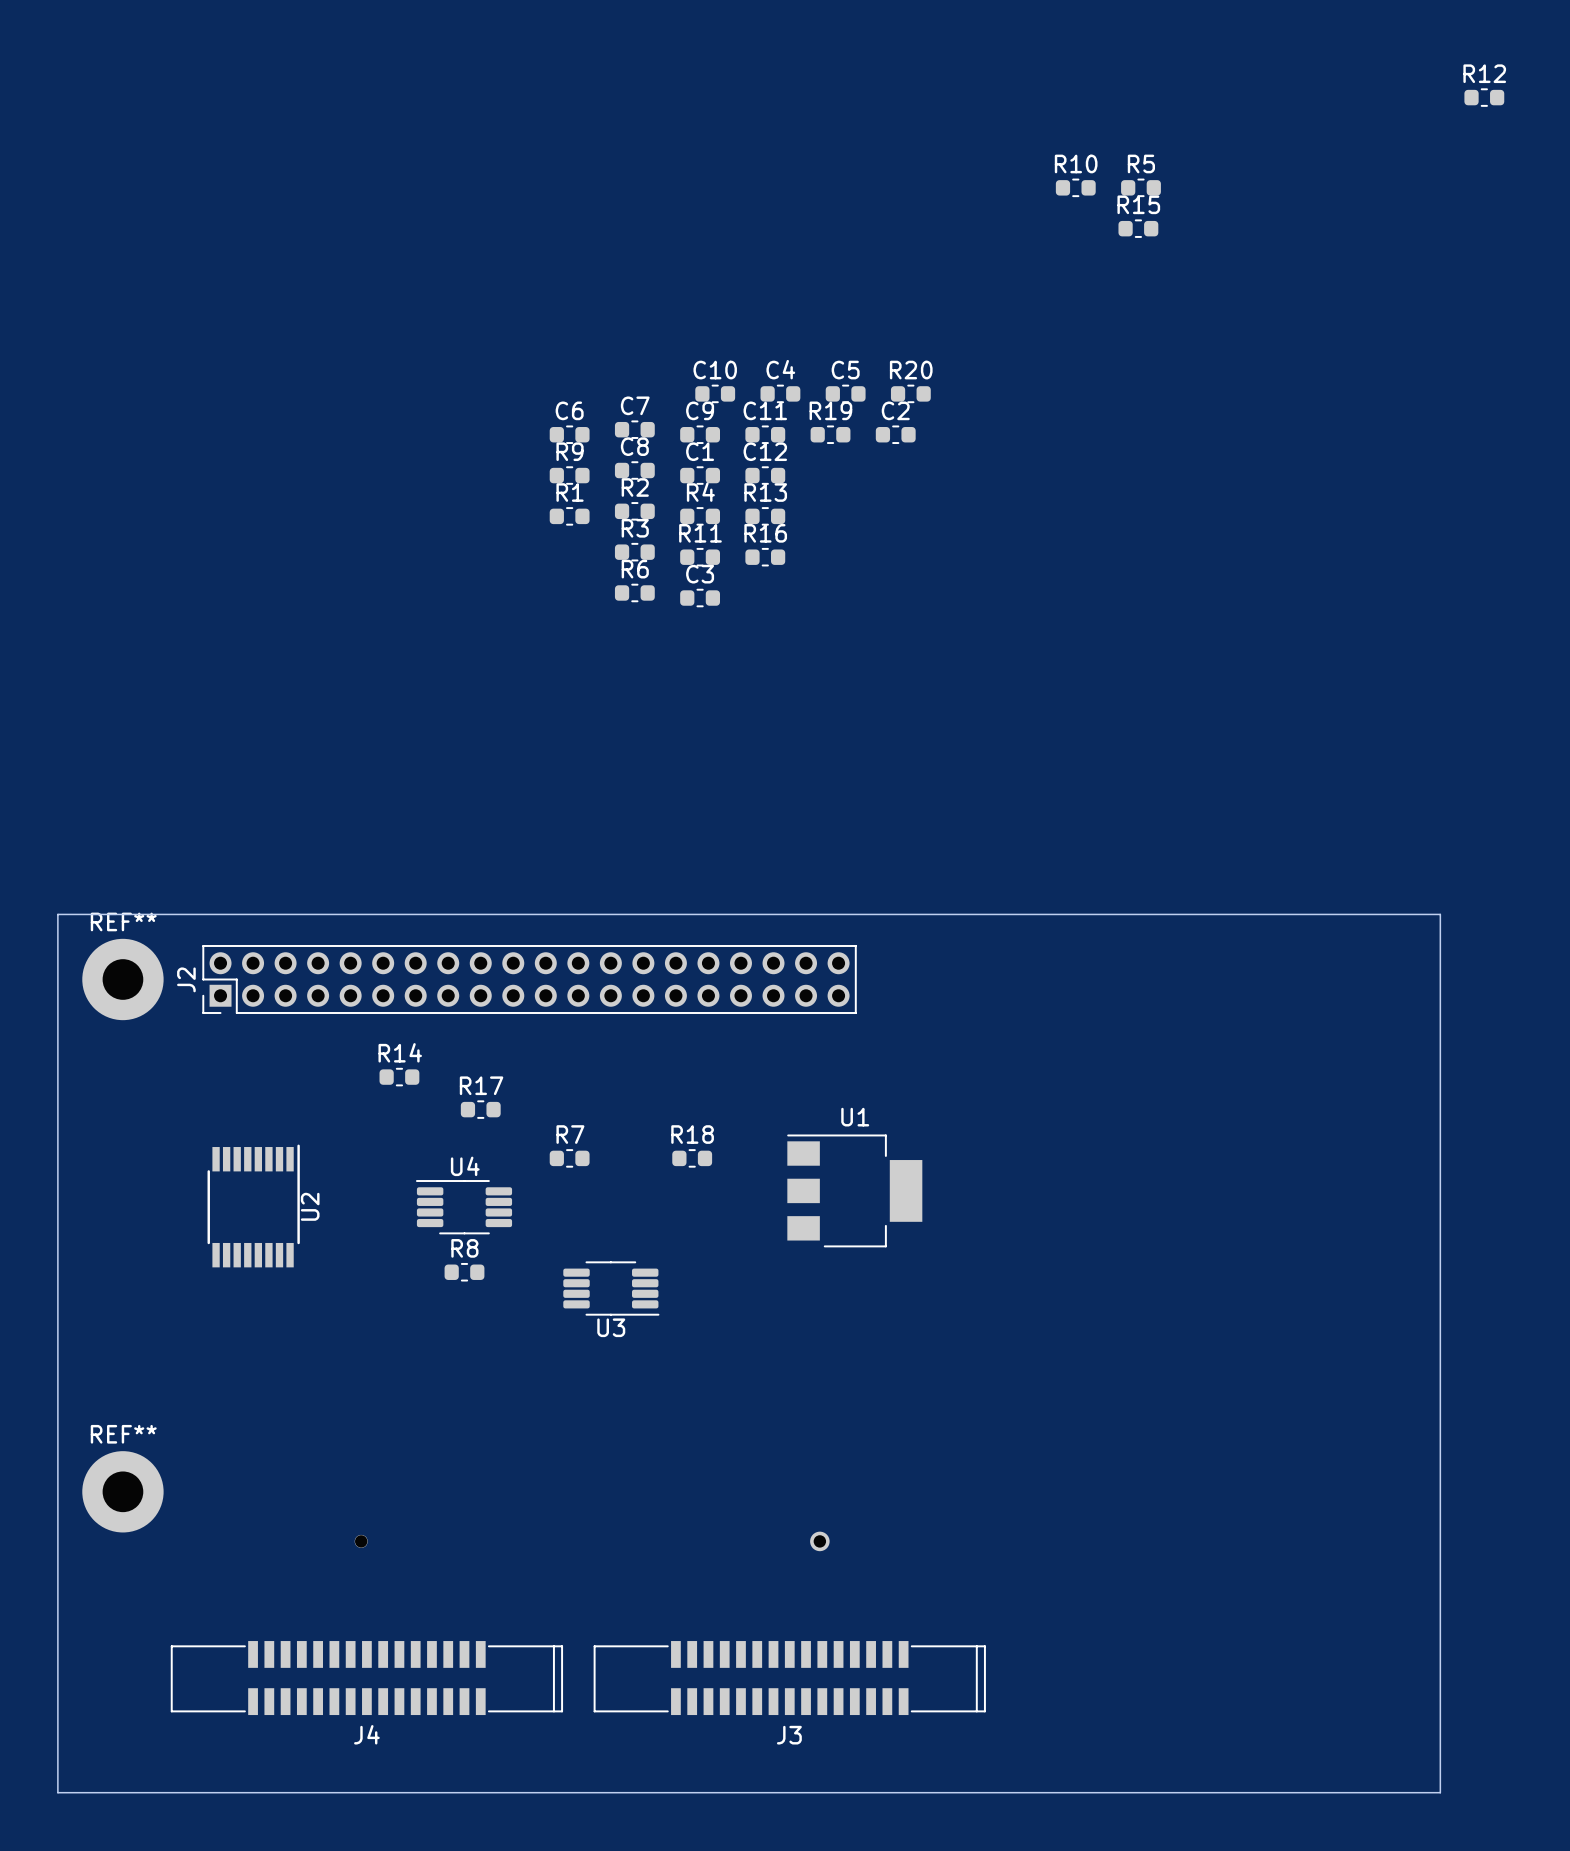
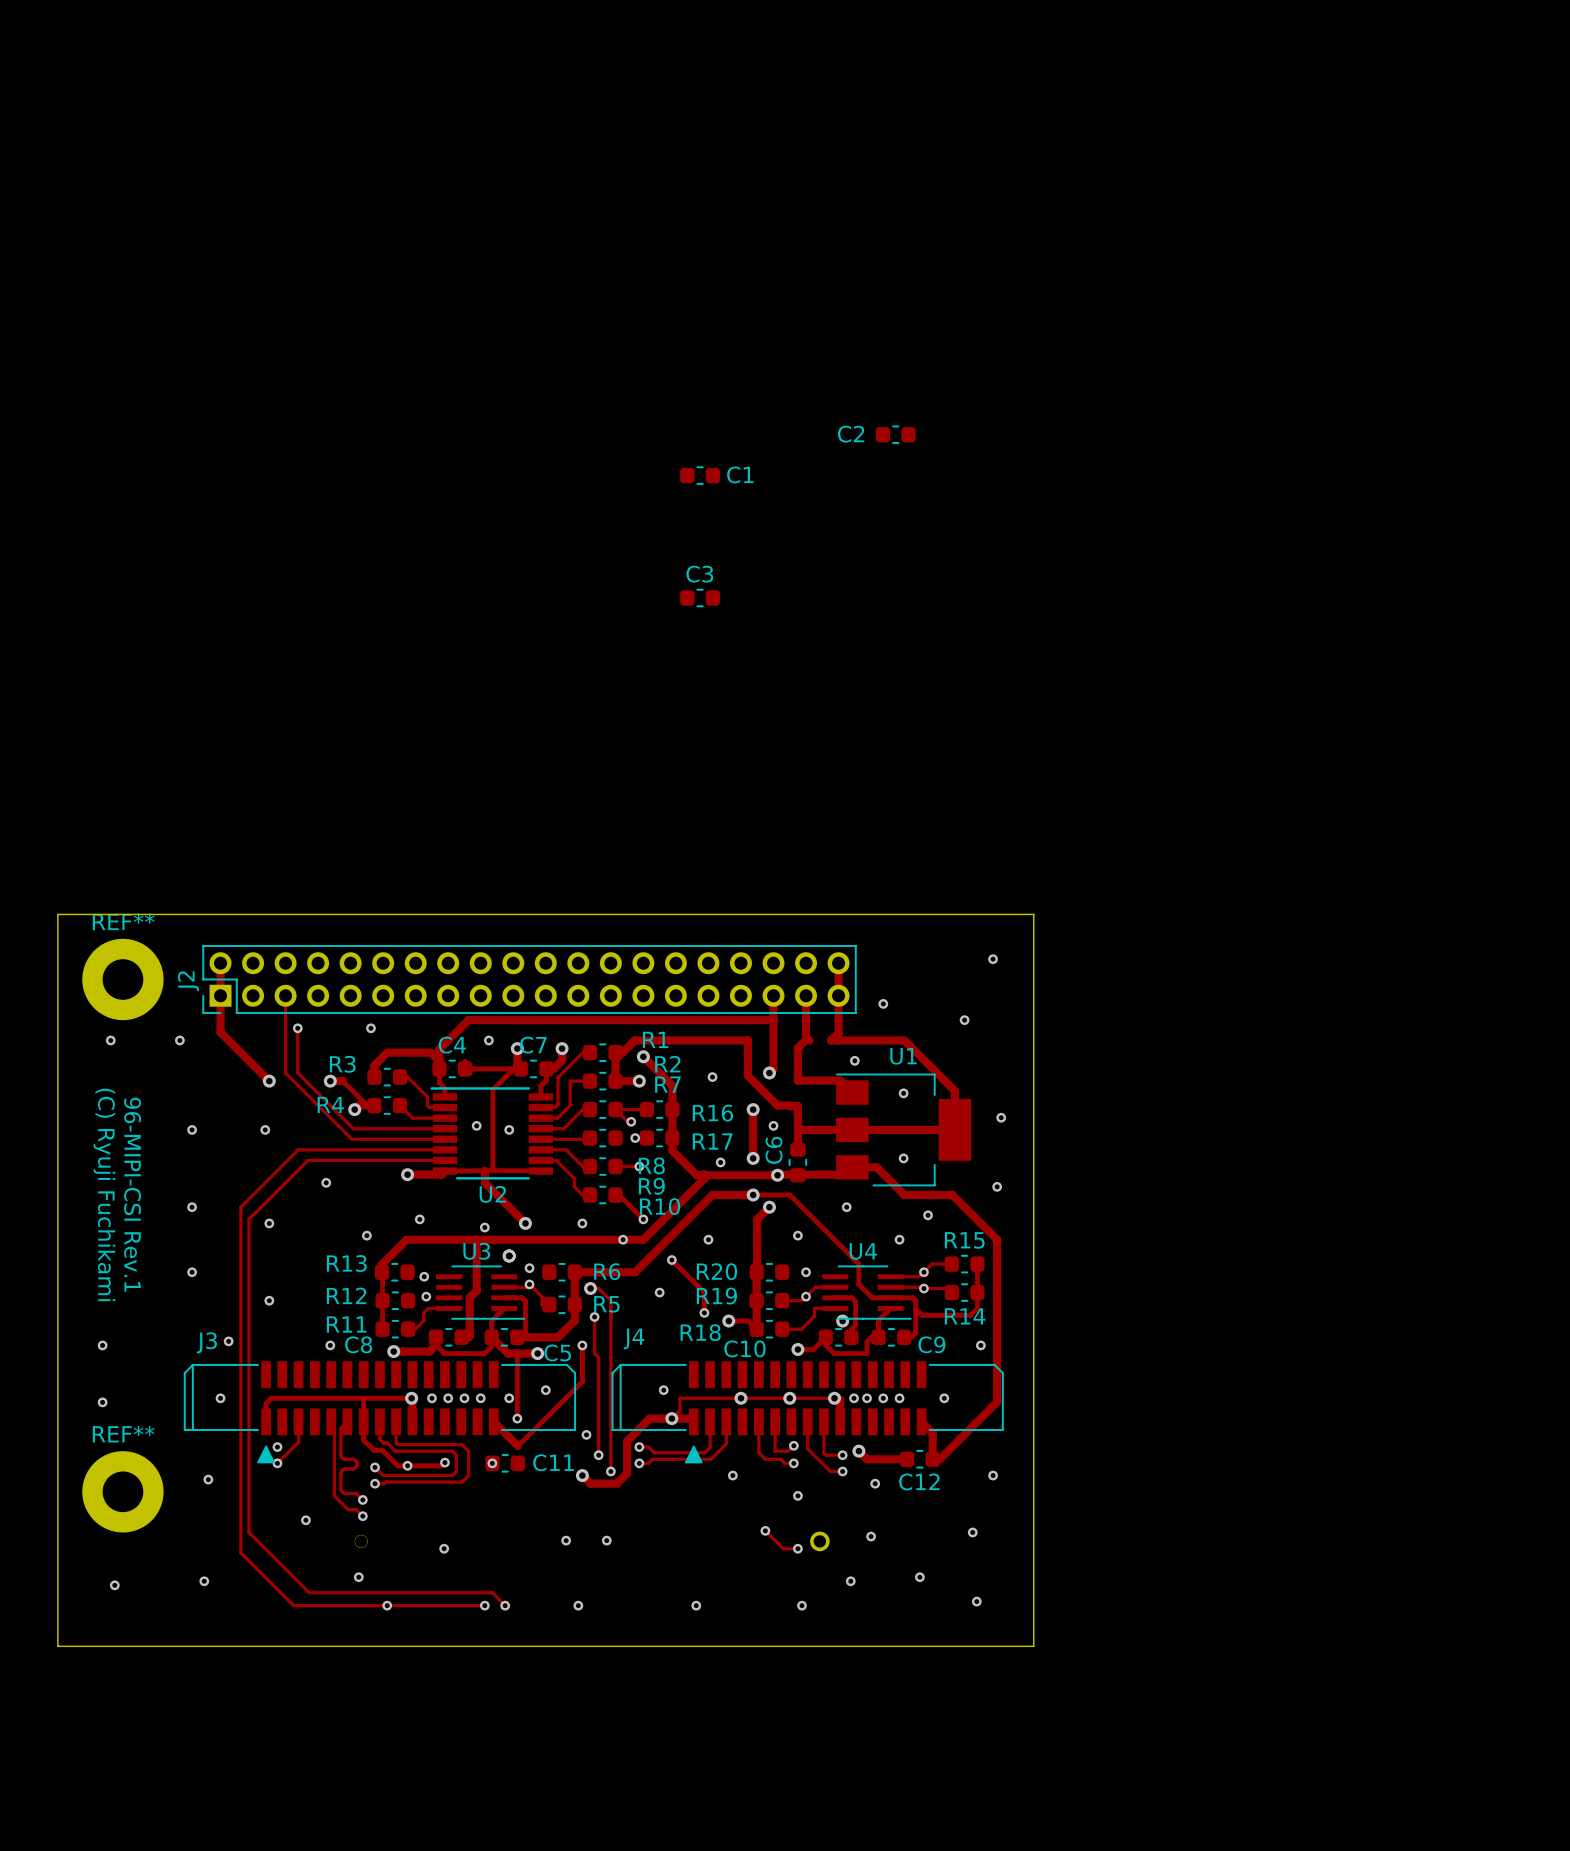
R12 name position: R12 (1484, 73) -> R12 (346, 1295)
R12 position: (1484, 97) -> (395, 1300)
R10 name position: R10 (1076, 163) -> R10 (660, 1206)
R5 name position: R5 (1141, 163) -> R5 (606, 1304)
R10 position: (1075, 187) -> (602, 1194)
R5 position: (1141, 187) -> (562, 1304)
R15 position: (1138, 228) -> (964, 1264)
C10 name position: C10 (715, 370) -> C10 (744, 1348)
C5 name position: C5 (845, 370) -> C5 (557, 1352)
R20 name position: R20 (911, 370) -> R20 (716, 1271)
C10 position: (715, 393) -> (838, 1337)
C4 position: (780, 393) -> (452, 1068)
C5 position: (845, 393) -> (504, 1337)
R20 position: (910, 393) -> (769, 1272)
C9 name position: C9 (700, 410) -> C9 (931, 1344)
C11 name position: C11 (765, 410) -> C11 (553, 1462)
R19 name position: R19 (830, 410) -> R19 (716, 1296)
C2 name position: C2 (895, 410) -> C2 (851, 434)
C7 position: (634, 429) -> (533, 1068)
C6 rotation: 0° (569, 434) -> 90° clockwise (797, 1162)
C6 position: (569, 434) -> (797, 1162)
C9 position: (700, 434) -> (891, 1337)
C11 position: (765, 434) -> (505, 1463)
R19 position: (830, 434) -> (769, 1300)
C8 name position: C8 (634, 446) -> C8 (358, 1344)
R9 name position: R9 (570, 451) -> R9 (651, 1186)
C1 name position: C1 (700, 451) -> C1 (740, 474)
C12 name position: C12 (765, 451) -> C12 (919, 1481)
C8 position: (634, 470) -> (448, 1337)
R9 position: (569, 475) -> (602, 1166)
C12 position: (765, 475) -> (919, 1459)
R2 name position: R2 (635, 487) -> R2 (667, 1064)
R1 name position: R1 (570, 492) -> R1 (655, 1039)
R4 name position: R4 (700, 492) -> R4 (330, 1104)
R13 name position: R13 (765, 492) -> R13 (346, 1263)
R2 position: (634, 511) -> (602, 1081)
R1 position: (569, 516) -> (602, 1052)
R4 position: (700, 516) -> (387, 1105)
R13 position: (765, 516) -> (394, 1272)
R3 name position: R3 (635, 528) -> R3 (342, 1064)
R11 name position: R11 (700, 533) -> R11 (346, 1324)
R16 name position: R16 (765, 533) -> R16 (712, 1113)
R3 position: (634, 552) -> (387, 1077)
R11 position: (700, 557) -> (395, 1329)
R16 position: (765, 557) -> (659, 1109)
R6 name position: R6 (635, 569) -> R6 (607, 1271)
R6 position: (634, 592) -> (562, 1272)
board edge: (1033, 914) (1440, 914) (1440, 1792) (57, 1792) (57, 1646) -> (1033, 914) (1033, 1646) (57, 1646)
via: none -> (993, 959)
track: none -> (220, 963) (220, 1032) (269, 1081)
track: none -> (838, 963) (838, 1032) (831, 1040) (904, 1040) (954, 1090) (954, 1129) (801, 1129) (797, 1125)
track: none -> (285, 995) (285, 1073) (351, 1139) (444, 1139)
track: none -> (773, 995) (773, 1068) (769, 1073)
track: none -> (806, 995) (806, 1037) (809, 1040)
via: none -> (883, 1003)
track: none -> (773, 1020) (468, 1020) (439, 1049) (439, 1082) (444, 1088) (444, 1097)
via: none -> (964, 1020)
track: none -> (297, 1028) (297, 1073) (353, 1128) (444, 1128)
via: none -> (297, 1028)
via: none -> (370, 1028)
via: none -> (110, 1040)
via: none -> (179, 1040)
via: none -> (488, 1040)
track: none -> (805, 1040) (797, 1048) (797, 1080) (840, 1080) (852, 1092)
track: none -> (517, 1048) (517, 1065) (520, 1068) (465, 1068) (465, 1061)
via: none -> (517, 1048)
track: none -> (562, 1048) (562, 1060) (553, 1068) (546, 1068) (546, 1080) (540, 1086) (540, 1097)
via: none -> (562, 1048)
R14 name position: R14 (400, 1052) -> R14 (965, 1316)
track: none -> (589, 1052) (582, 1052) (558, 1077) (558, 1104) (554, 1107) (540, 1107)
track: none -> (643, 1056) (672, 1085) (672, 1150) (696, 1175) (704, 1174)
via: none -> (643, 1056)
via: none -> (854, 1060)
track: none -> (439, 1061) (430, 1052) (387, 1052) (374, 1065) (374, 1077)
track: none -> (513, 1068) (492, 1089) (492, 1170)
via: none -> (769, 1073)
R14 position: (399, 1077) -> (964, 1292)
track: none -> (400, 1077) (407, 1077) (427, 1097) (427, 1105) (429, 1107) (444, 1107)
via: none -> (712, 1077)
via: none -> (269, 1081)
track: none -> (330, 1081) (342, 1080) (367, 1105) (374, 1105) (358, 1105) (354, 1109)
via: none -> (330, 1081)
track: none -> (589, 1081) (570, 1081) (570, 1105) (557, 1118) (540, 1118)
track: none -> (639, 1081) (615, 1081) (615, 1052) (622, 1052) (634, 1040) (747, 1040) (747, 1075) (777, 1105) (797, 1106) (797, 1149)
via: none -> (639, 1081)
R17 name position: R17 (481, 1085) -> R17 (712, 1141)
via: none -> (903, 1093)
track: none -> (400, 1105) (412, 1118) (444, 1118)
via: none -> (354, 1109)
R17 position: (480, 1109) -> (659, 1138)
track: none -> (589, 1109) (582, 1109) (563, 1128) (540, 1128)
track: none -> (646, 1109) (615, 1109) (627, 1121) (631, 1121)
track: none -> (753, 1109) (753, 1158)
via: none -> (753, 1109)
via: none -> (1001, 1117)
via: none -> (631, 1121)
via: none -> (476, 1125)
via: none -> (773, 1125)
via: none -> (192, 1129)
via: none -> (265, 1129)
via: none -> (509, 1129)
R7 name position: R7 (570, 1134) -> R7 (667, 1084)
R18 name position: R18 (692, 1134) -> R18 (700, 1332)
track: none -> (589, 1138) (540, 1139)
via: none -> (635, 1138)
track: none -> (444, 1149) (298, 1149) (240, 1207) (240, 1552) (293, 1605) (484, 1605)
track: none -> (540, 1149) (566, 1149) (582, 1166) (589, 1166)
R7 position: (569, 1158) -> (602, 1109)
R18 position: (692, 1158) -> (769, 1329)
via: none -> (753, 1158)
via: none -> (903, 1158)
track: none -> (444, 1160) (307, 1160) (248, 1219) (248, 1532) (309, 1592) (492, 1592) (505, 1605)
track: none -> (540, 1160) (556, 1160) (574, 1178) (574, 1186) (582, 1194) (589, 1194)
via: none -> (720, 1162)
track: none -> (615, 1166) (639, 1166)
via: none -> (639, 1166)
track: none -> (484, 1170) (484, 1182) (525, 1223)
track: none -> (492, 1170) (540, 1171)
track: none -> (492, 1170) (444, 1171)
track: none -> (444, 1171) (441, 1174) (407, 1174)
via: none -> (407, 1174)
track: none -> (704, 1174) (704, 1178) (643, 1239) (406, 1239) (381, 1264) (382, 1329)
track: none -> (704, 1174) (845, 1174) (852, 1167) (876, 1167) (904, 1194) (952, 1194) (997, 1239) (997, 1401) (939, 1459) (932, 1459) (932, 1433) (921, 1421)
via: none -> (777, 1175)
U4 footprint: [415, 1180, 513, 1235] -> [822, 1265, 912, 1320]
via: none -> (326, 1182)
via: none -> (997, 1186)
U1 position: (854, 1190) -> (903, 1129)
text: none -> 96-MIPI-CSI Rev.1 (132, 1194)
track: none -> (615, 1194) (619, 1194) (643, 1219)
via: none -> (753, 1194)
text: none -> (C) Ryuji Fuchikami (104, 1194)
U2 rotation: 0° (253, 1205) -> 90° counterclockwise (491, 1133)
U2 position: (253, 1205) -> (491, 1133)
U2 name position: U2 (310, 1206) -> U2 (492, 1194)
via: none -> (192, 1207)
track: none -> (769, 1207) (757, 1219) (756, 1329) (748, 1321) (728, 1321)
via: none -> (769, 1207)
via: none -> (846, 1207)
via: none -> (928, 1215)
via: none -> (419, 1219)
via: none -> (643, 1219)
via: none -> (269, 1223)
via: none -> (525, 1223)
via: none -> (582, 1223)
via: none -> (484, 1227)
via: none -> (366, 1235)
via: none -> (797, 1235)
track: none -> (476, 1239) (476, 1290) (469, 1297) (469, 1336) (461, 1337)
via: none -> (623, 1239)
via: none -> (708, 1239)
via: none -> (899, 1239)
R8 name position: R8 (464, 1248) -> R8 (651, 1165)
via: none -> (509, 1255)
track: none -> (671, 1260) (704, 1292) (704, 1312)
via: none -> (671, 1260)
U3 footprint: [563, 1261, 660, 1316] -> [436, 1265, 526, 1320]
track: none -> (951, 1264) (932, 1264) (919, 1276) (890, 1276)
track: none -> (977, 1264) (977, 1308) (970, 1315) (922, 1315) (915, 1308)
via: none -> (529, 1268)
via: none -> (192, 1272)
R8 position: (464, 1272) -> (602, 1138)
track: none -> (574, 1272) (574, 1320) (558, 1337) (517, 1337) (525, 1336) (525, 1301) (522, 1297) (504, 1297)
track: none -> (574, 1272) (635, 1272) (712, 1194) (789, 1194) (858, 1264) (858, 1284) (872, 1297) (912, 1297) (915, 1300) (915, 1332) (911, 1337) (904, 1337)
via: none -> (806, 1272)
via: none -> (923, 1272)
via: none -> (424, 1276)
via: none -> (529, 1284)
track: none -> (504, 1287) (526, 1287) (529, 1284) (542, 1297) (542, 1304) (549, 1304)
track: none -> (835, 1287) (815, 1287) (801, 1300) (786, 1300)
track: none -> (890, 1287) (947, 1288) (951, 1292)
track: none -> (590, 1288) (598, 1288) (610, 1300) (610, 1471)
via: none -> (590, 1288)
via: none -> (923, 1288)
via: none -> (659, 1292)
via: none -> (426, 1296)
via: none -> (806, 1296)
track: none -> (835, 1297) (851, 1297) (855, 1301) (855, 1325) (851, 1329) (851, 1337)
via: none -> (269, 1300)
track: none -> (442, 1308) (428, 1308) (423, 1312) (423, 1320) (415, 1329) (408, 1329)
track: none -> (504, 1308) (491, 1321) (491, 1346) (484, 1353) (444, 1353) (436, 1345)
track: none -> (835, 1308) (814, 1308) (814, 1316) (801, 1329) (782, 1329)
track: none -> (890, 1308) (878, 1320) (878, 1337) (871, 1337) (867, 1341) (867, 1353) (834, 1353) (825, 1345) (825, 1337) (813, 1349) (797, 1349)
via: none -> (704, 1312)
track: none -> (594, 1316) (594, 1353) (598, 1357) (598, 1455)
via: none -> (594, 1316)
via: none -> (728, 1321)
via: none -> (842, 1321)
U3 name position: U3 (611, 1327) -> U3 (476, 1251)
track: none -> (491, 1337) (508, 1353) (537, 1353)
via: none -> (228, 1341)
via: none -> (102, 1345)
via: none -> (330, 1345)
track: none -> (436, 1345) (429, 1351) (393, 1351)
track: none -> (582, 1345) (582, 1381) (517, 1446) (493, 1421)
via: none -> (582, 1345)
via: none -> (980, 1345)
via: none -> (797, 1349)
via: none -> (393, 1351)
track: none -> (517, 1353) (517, 1418)
via: none -> (537, 1353)
via: none -> (545, 1390)
via: none -> (663, 1390)
via: none -> (220, 1398)
track: none -> (362, 1398) (363, 1440) (373, 1450) (382, 1450) (397, 1465) (441, 1465) (444, 1462)
via: none -> (411, 1398)
via: none -> (431, 1398)
via: none -> (448, 1398)
via: none -> (464, 1398)
via: none -> (480, 1398)
via: none -> (509, 1398)
via: none -> (740, 1398)
via: none -> (789, 1398)
via: none -> (834, 1398)
via: none -> (854, 1398)
via: none -> (867, 1398)
via: none -> (883, 1398)
via: none -> (899, 1398)
via: none -> (944, 1398)
via: none -> (102, 1402)
via: none -> (517, 1418)
track: none -> (671, 1418) (679, 1410) (679, 1398) (838, 1398) (840, 1400) (840, 1421)
via: none -> (671, 1418)
track: none -> (266, 1421) (266, 1403) (271, 1398) (411, 1398) (412, 1421)
track: none -> (298, 1421) (298, 1442) (277, 1463)
track: none -> (331, 1421) (334, 1425) (334, 1495) (348, 1509) (356, 1509) (362, 1516)
track: none -> (347, 1421) (340, 1428) (341, 1455) (344, 1459) (354, 1459) (357, 1464) (354, 1468) (344, 1469) (341, 1471) (340, 1490) (344, 1493) (356, 1493) (362, 1499)
track: none -> (379, 1421) (379, 1439) (395, 1451) (452, 1451) (456, 1455) (456, 1471) (452, 1475) (383, 1475) (375, 1467)
track: none -> (396, 1421) (396, 1442) (398, 1444) (462, 1444) (468, 1451) (468, 1475) (462, 1482) (375, 1483)
track: none -> (693, 1421) (690, 1418) (649, 1418) (627, 1441) (627, 1473) (616, 1483) (590, 1483) (582, 1475)
track: none -> (710, 1421) (710, 1447) (704, 1452) (654, 1452) (648, 1447) (639, 1447)
track: none -> (726, 1421) (726, 1444) (711, 1459) (652, 1459) (648, 1463) (639, 1463)
track: none -> (758, 1421) (758, 1452) (765, 1459) (780, 1459) (784, 1463) (793, 1463)
track: none -> (775, 1421) (775, 1451) (788, 1451) (793, 1445)
track: none -> (807, 1421) (807, 1448) (830, 1471) (842, 1471)
track: none -> (823, 1421) (823, 1452) (826, 1455) (842, 1455)
via: none -> (586, 1434)
via: none -> (793, 1445)
via: none -> (277, 1447)
via: none -> (639, 1447)
track: none -> (858, 1451) (867, 1459) (907, 1459)
via: none -> (858, 1451)
via: none -> (598, 1455)
via: none -> (842, 1455)
via: none -> (444, 1462)
via: none -> (277, 1463)
via: none -> (492, 1463)
via: none -> (639, 1463)
via: none -> (793, 1463)
via: none -> (407, 1465)
via: none -> (375, 1467)
via: none -> (610, 1471)
via: none -> (842, 1471)
via: none -> (582, 1475)
via: none -> (732, 1475)
via: none -> (993, 1475)
via: none -> (208, 1479)
via: none -> (375, 1483)
via: none -> (875, 1483)
via: none -> (797, 1495)
via: none -> (362, 1499)
via: none -> (362, 1516)
via: none -> (305, 1520)
track: none -> (765, 1530) (783, 1548) (797, 1548)
via: none -> (765, 1530)
via: none -> (972, 1532)
via: none -> (871, 1536)
via: none -> (566, 1540)
via: none -> (606, 1540)
via: none -> (444, 1548)
via: none -> (797, 1548)
via: none -> (358, 1577)
via: none -> (919, 1577)
via: none -> (204, 1581)
via: none -> (850, 1581)
via: none -> (114, 1585)
via: none -> (976, 1601)
via: none -> (387, 1605)
via: none -> (484, 1605)
via: none -> (505, 1605)
via: none -> (578, 1605)
via: none -> (696, 1605)
via: none -> (801, 1605)
J4 footprint: [170, 1641, 564, 1716] -> [611, 1361, 1004, 1464]
J3 footprint: [593, 1641, 986, 1716] -> [183, 1361, 577, 1464]
J4 name position: J4 (366, 1734) -> J4 (634, 1338)
J3 name position: J3 (789, 1735) -> J3 (206, 1342)

